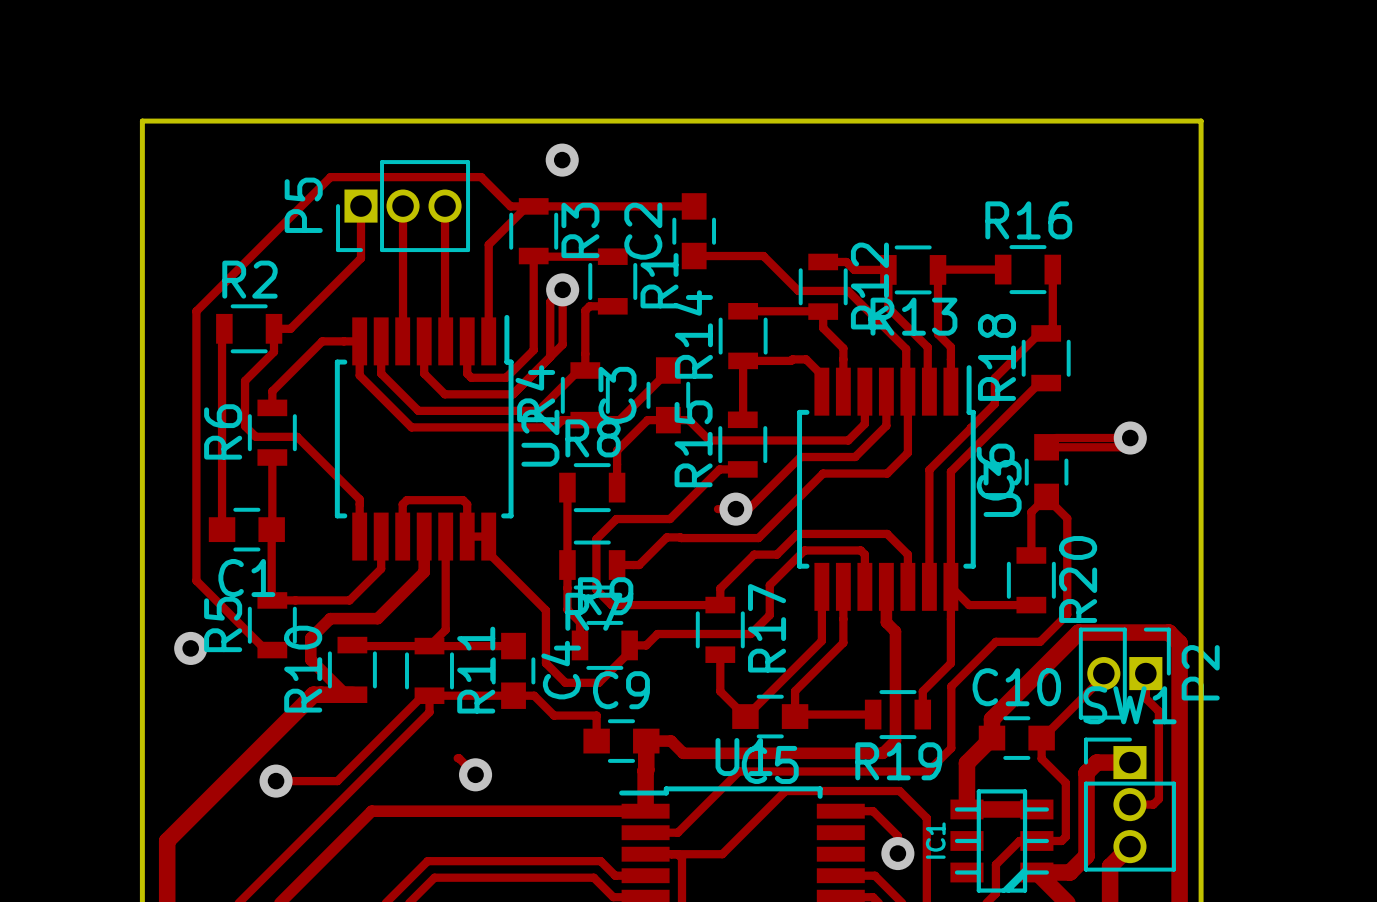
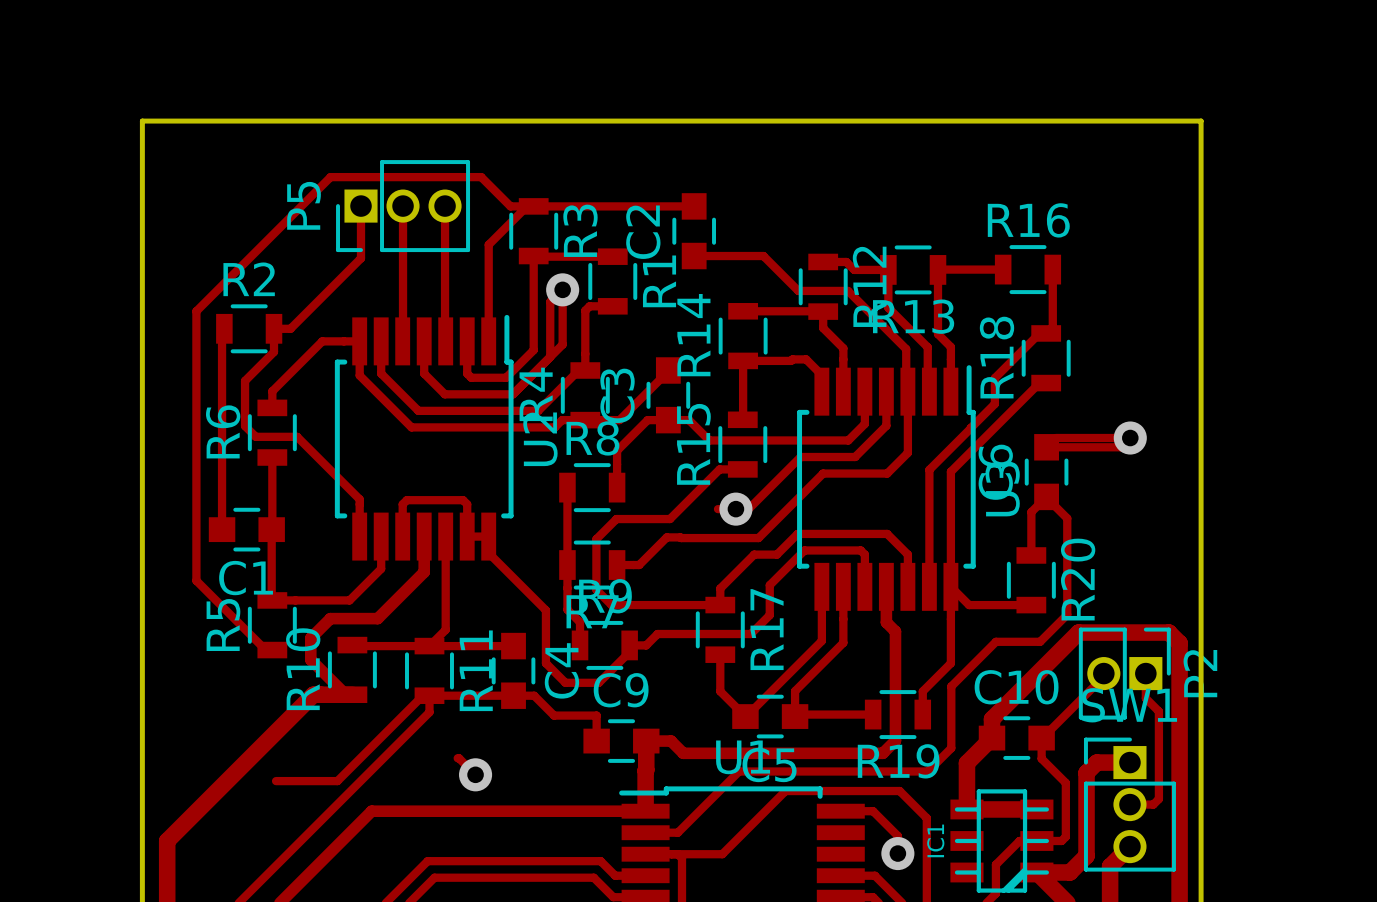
via: (562, 160) -> none
via: (190, 648) -> none
via: (276, 781) -> none

